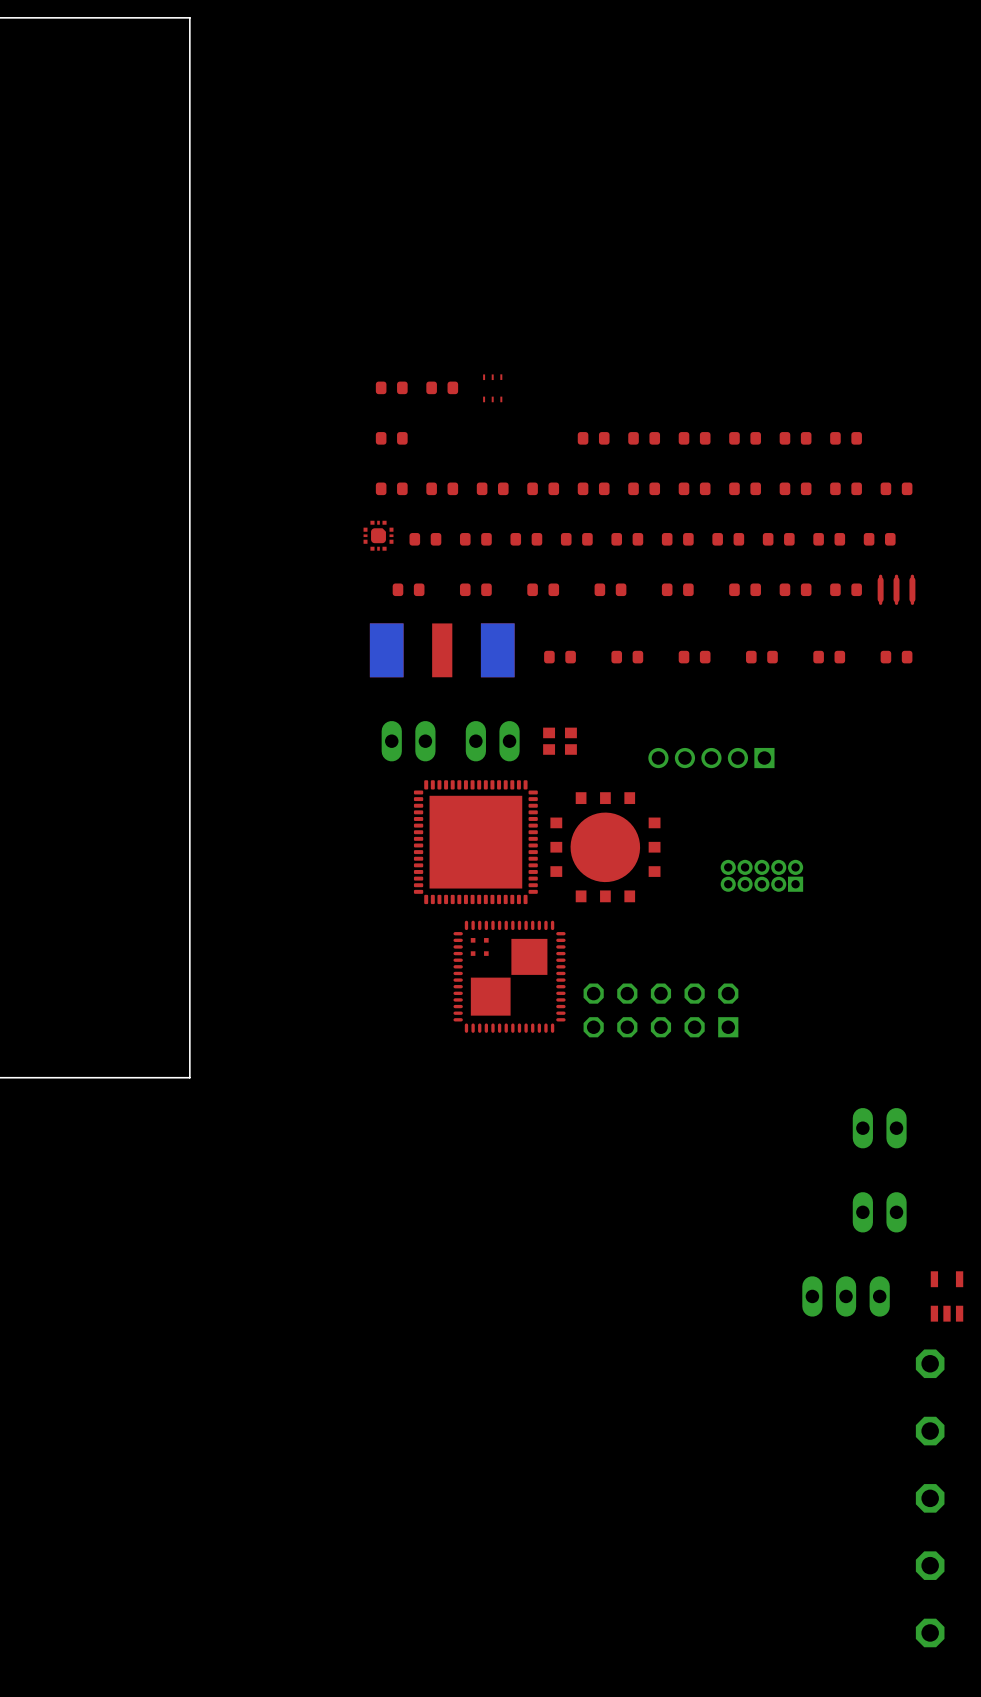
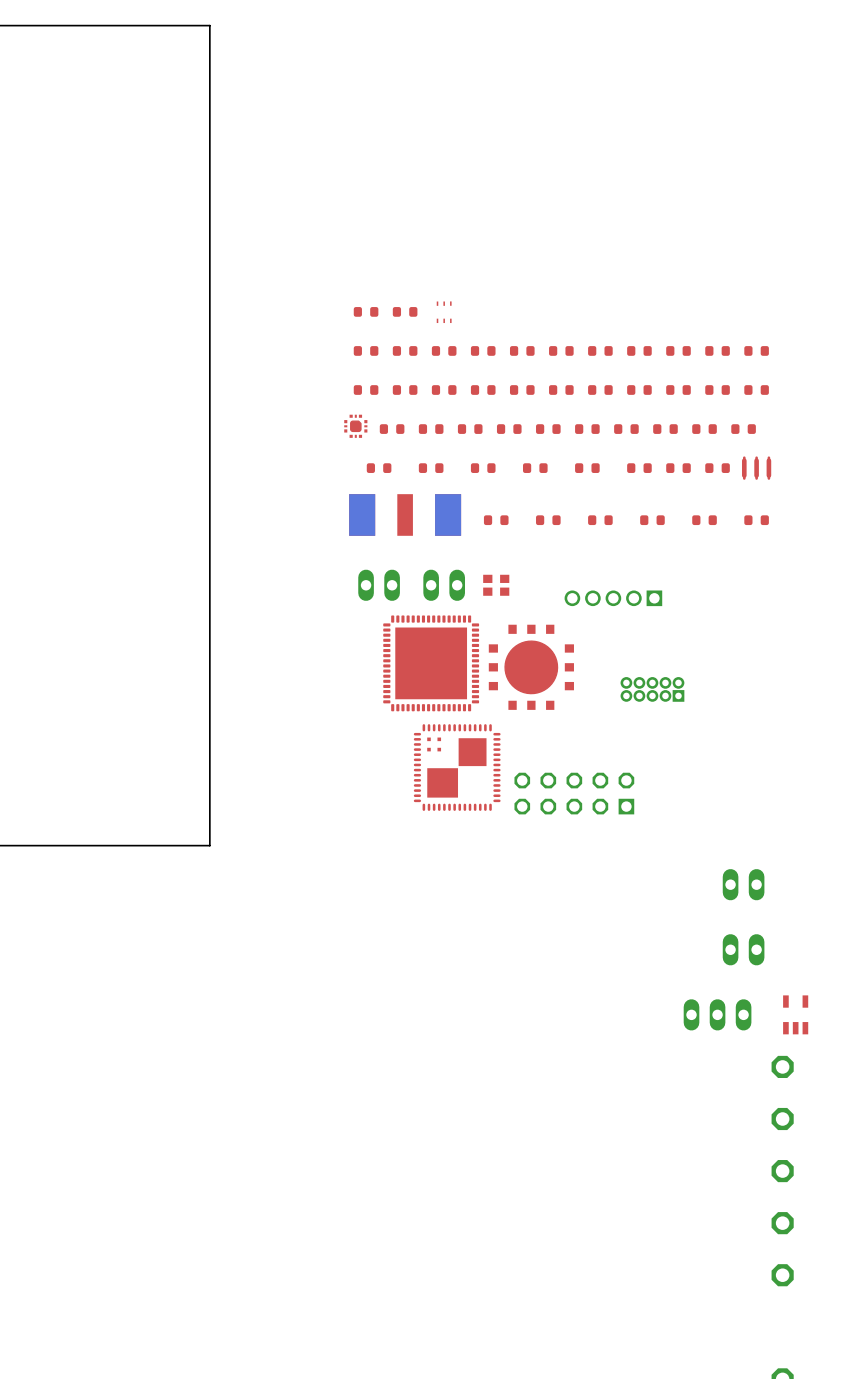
part: none -> (405, 350)
part: none -> (444, 350)
part: none -> (483, 350)
part: none -> (756, 350)

